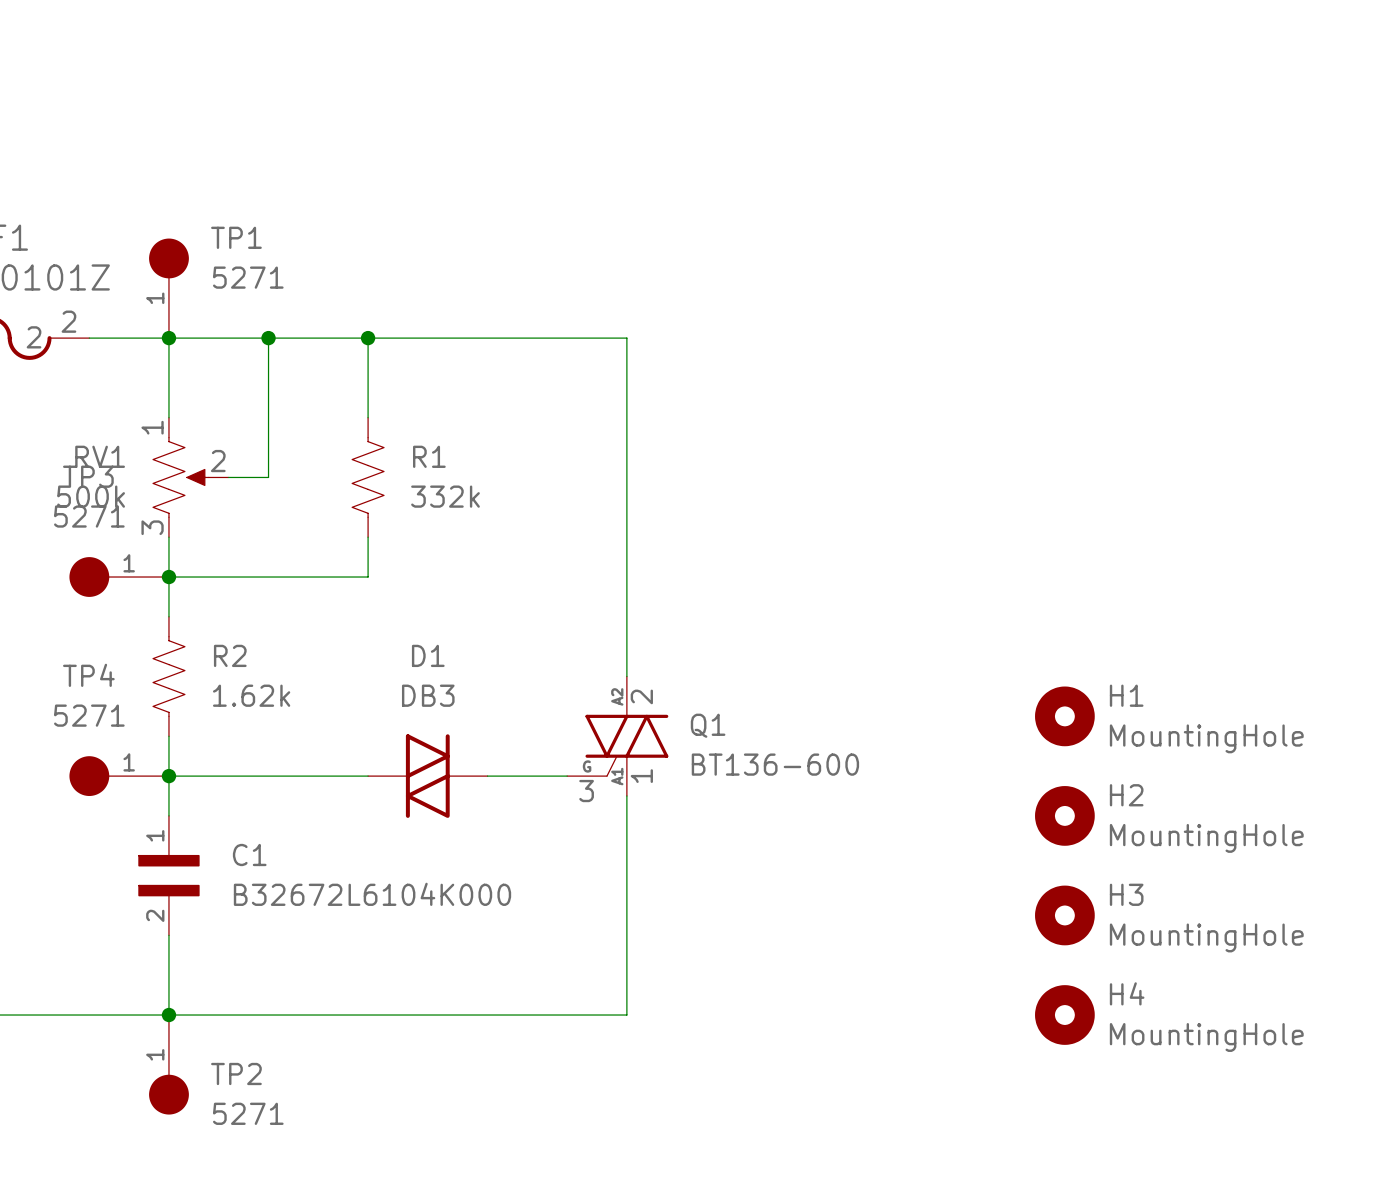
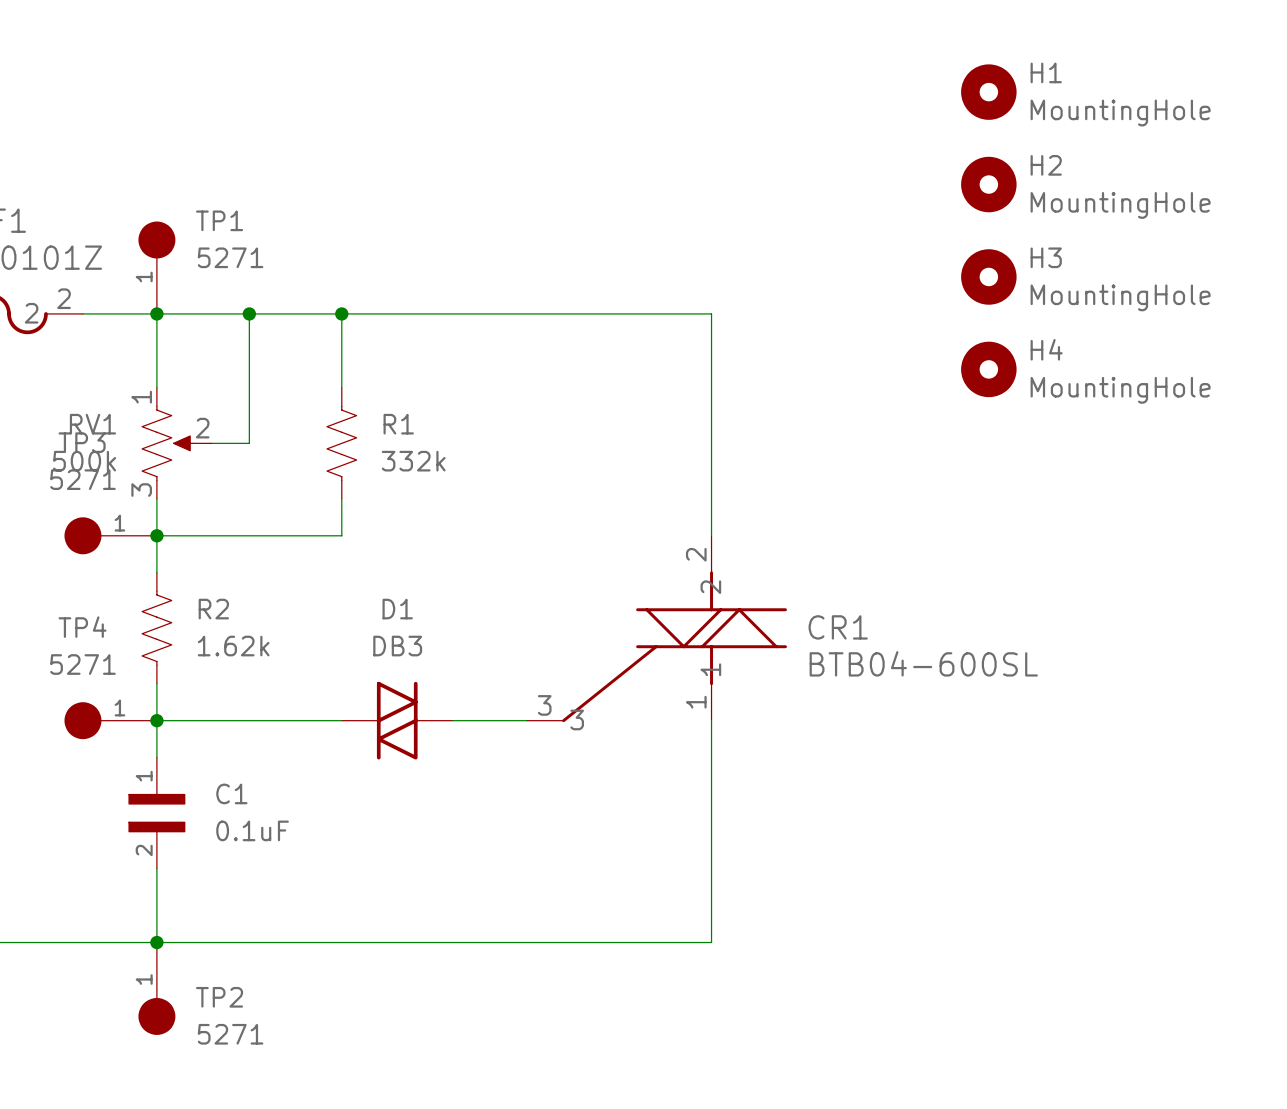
wire: (626, 338) (626, 676) -> (582, 313) (711, 313) (711, 535)
CR1: none -> BTB04-600SL (656, 628)
H1 position: (1064, 716) -> (988, 92)
Q1: BT136-600 (617, 736) -> none
wire: (626, 796) (626, 1015) -> (711, 720) (711, 942) (582, 942)
H2 position: (1064, 815) -> (988, 184)
C1 value: B32672L6104K000 (372, 894) -> 0.1uF (252, 830)
H3 position: (1064, 915) -> (988, 276)
H4 position: (1064, 1015) -> (988, 369)

